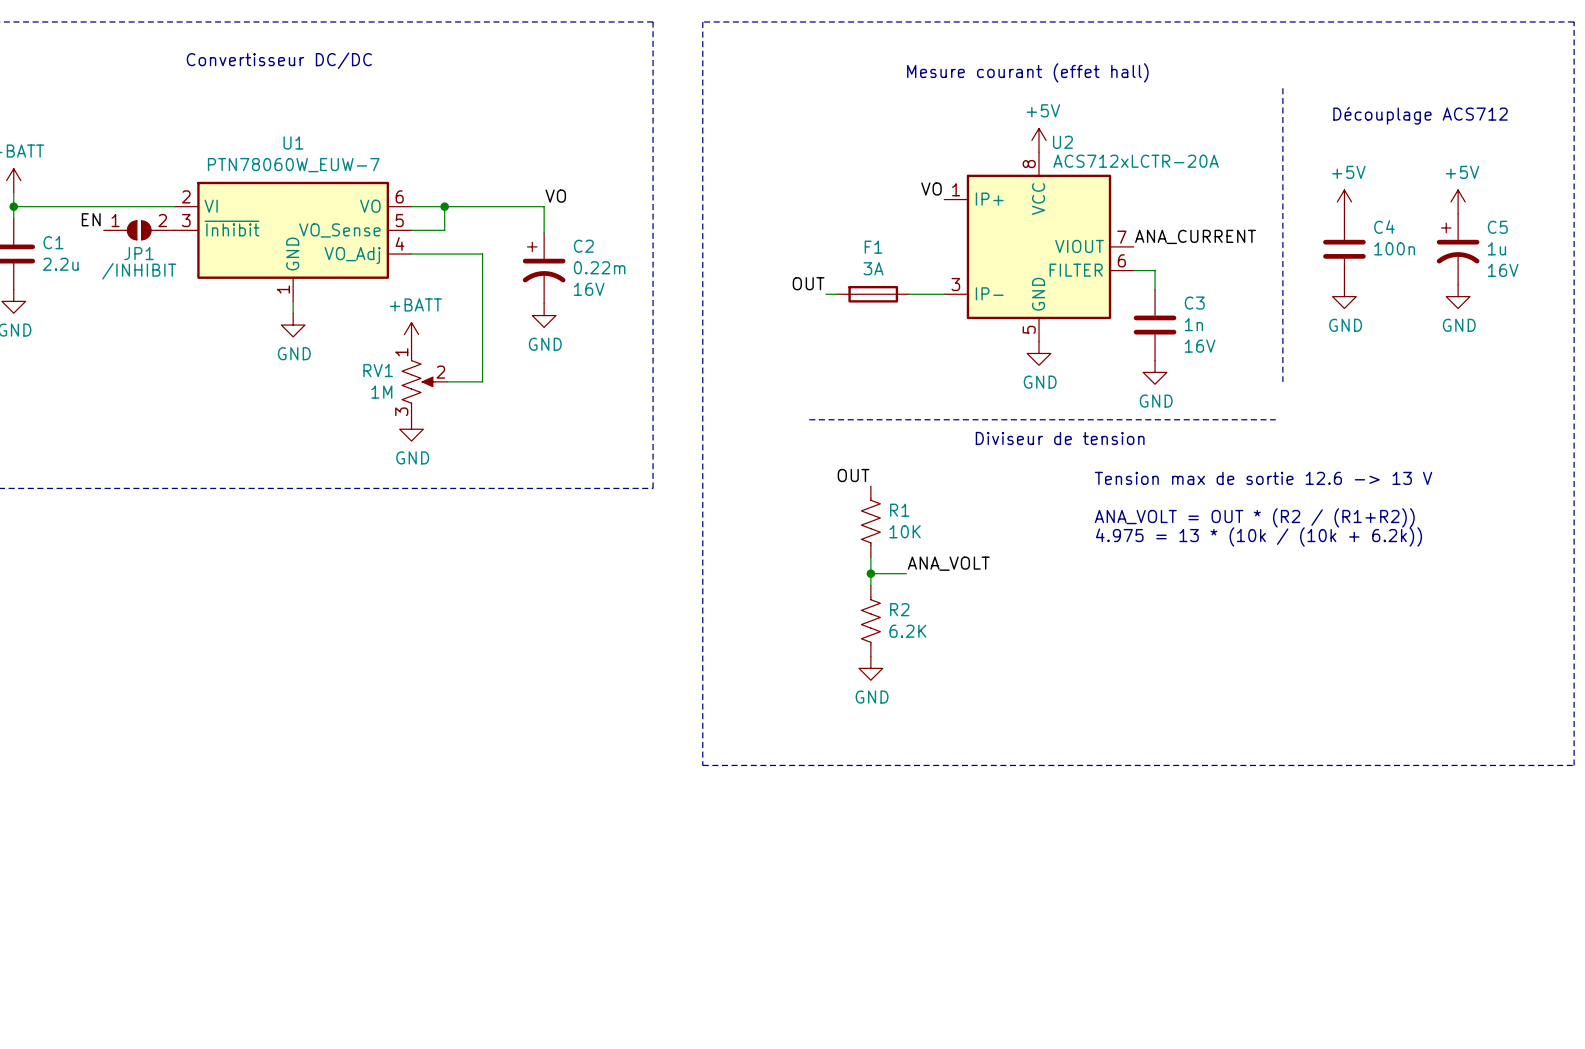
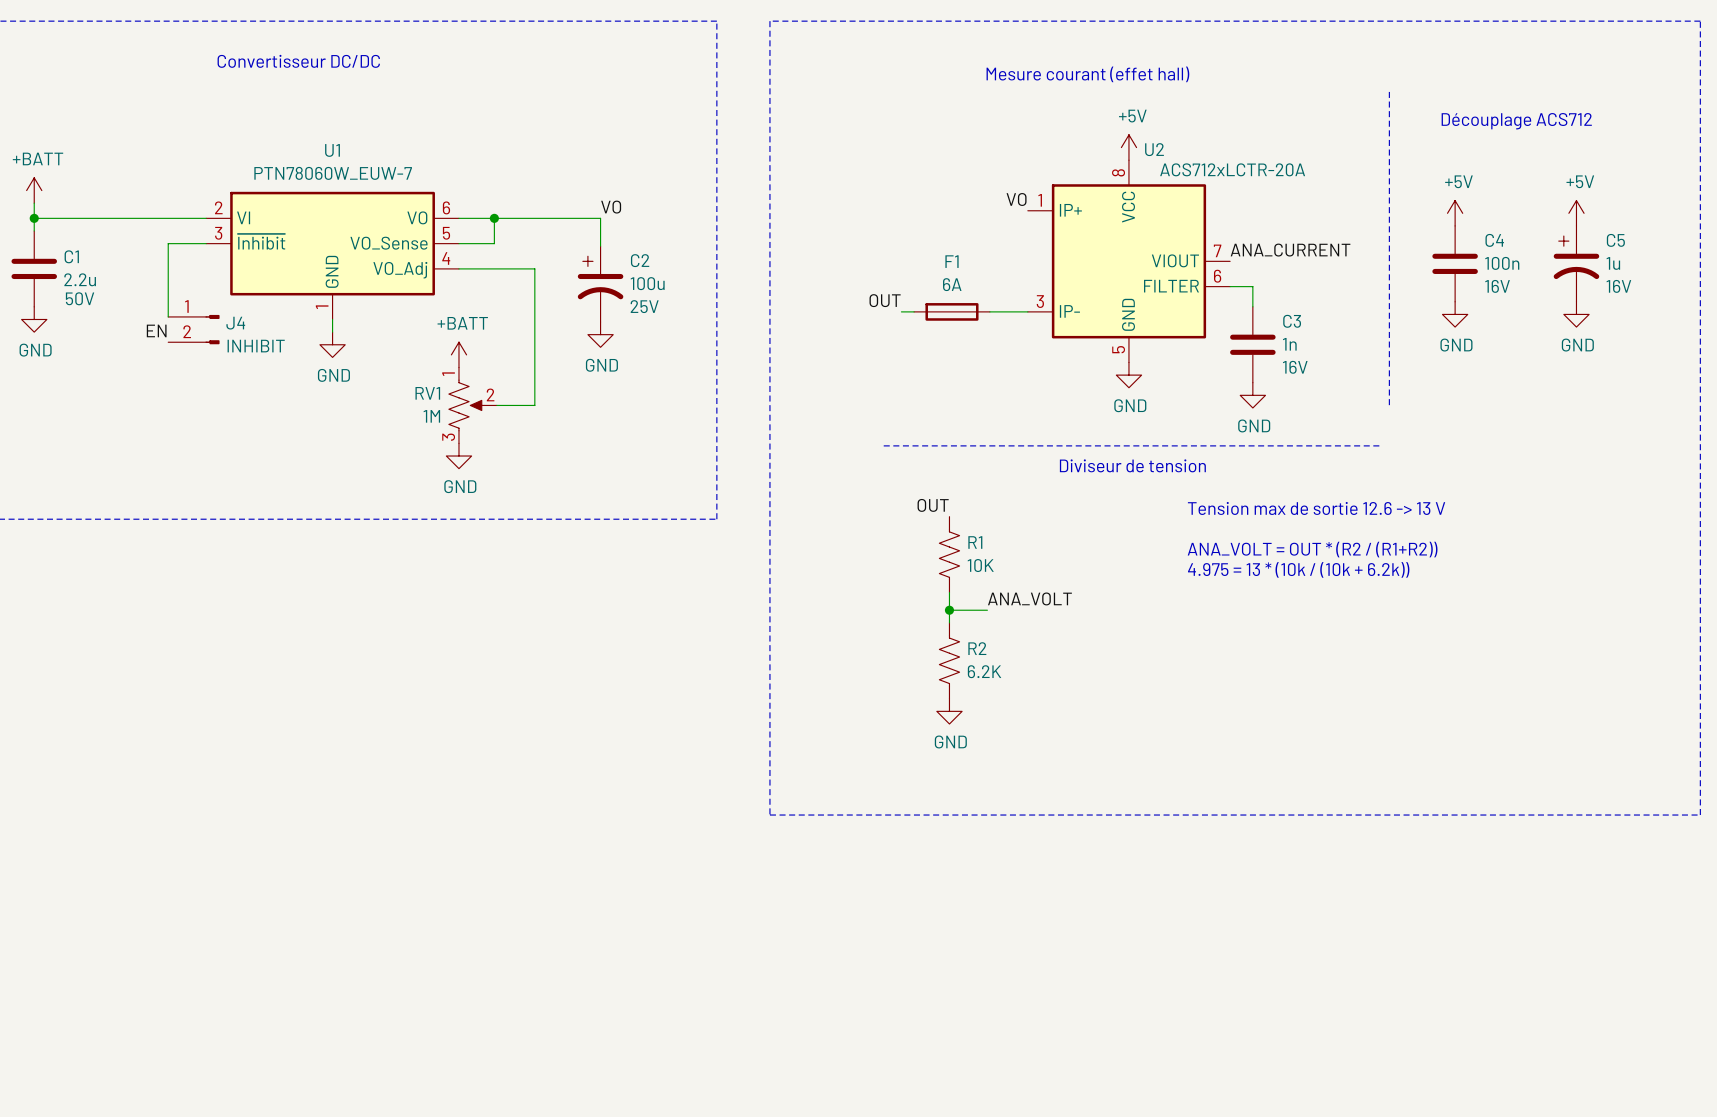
label position: EN (91, 219) -> EN (156, 330)
JP1: /INHIBIT (139, 230) -> none
wire: none -> (206, 243) (168, 243) (168, 316)
C2 value: 0.22m (599, 267) -> 100u (647, 283)
F1 value: 3A (873, 268) -> 6A (952, 284)
C4 text: none -> 16V (1497, 286)
C1 text: none -> 50V (80, 298)
C2 text: 16V (589, 289) -> 25V (644, 306)
J4: none -> INHIBIT (193, 329)

